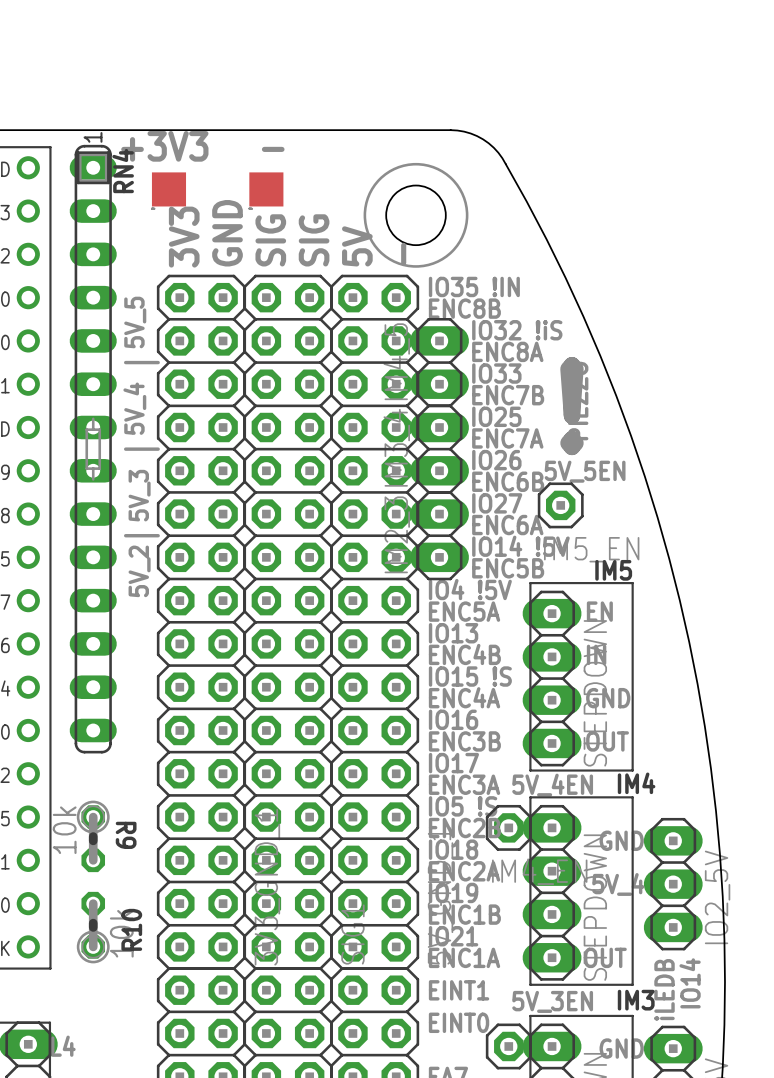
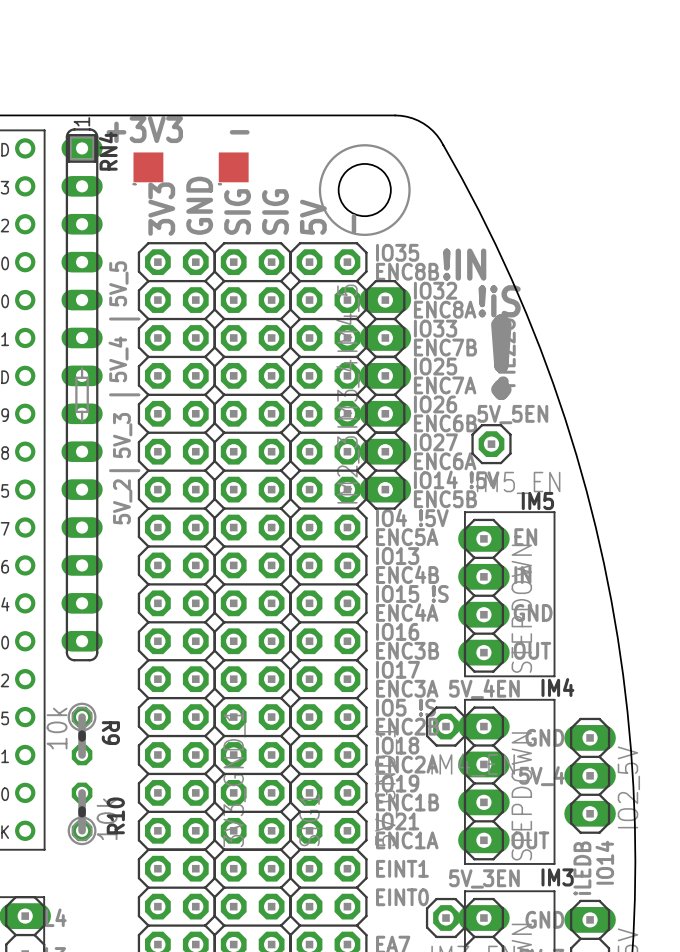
text: IO35 !IN (474, 286) -> IO35 (397, 252)
text: none -> !IN (464, 264)
text: IO32 !iS (517, 330) -> IO32 (435, 290)
text: none -> !iS (499, 301)

